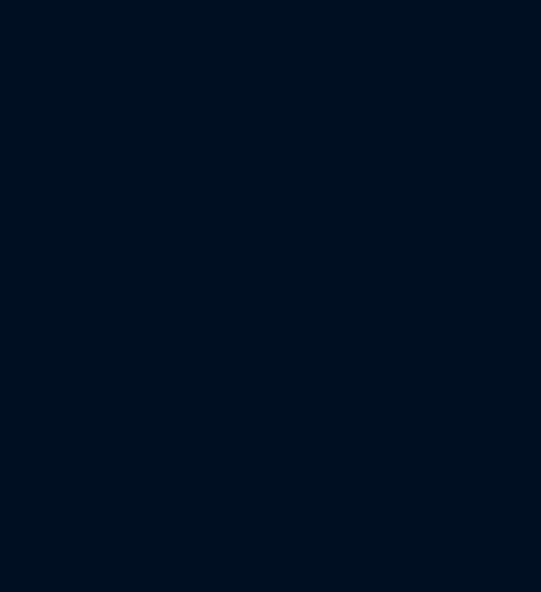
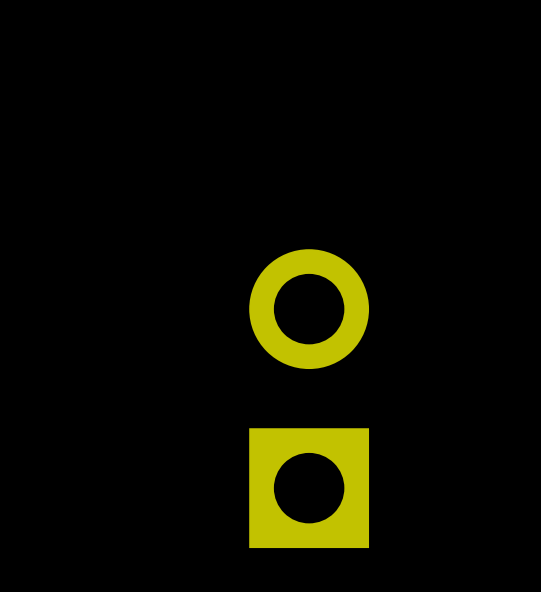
part: none -> (309, 398)

